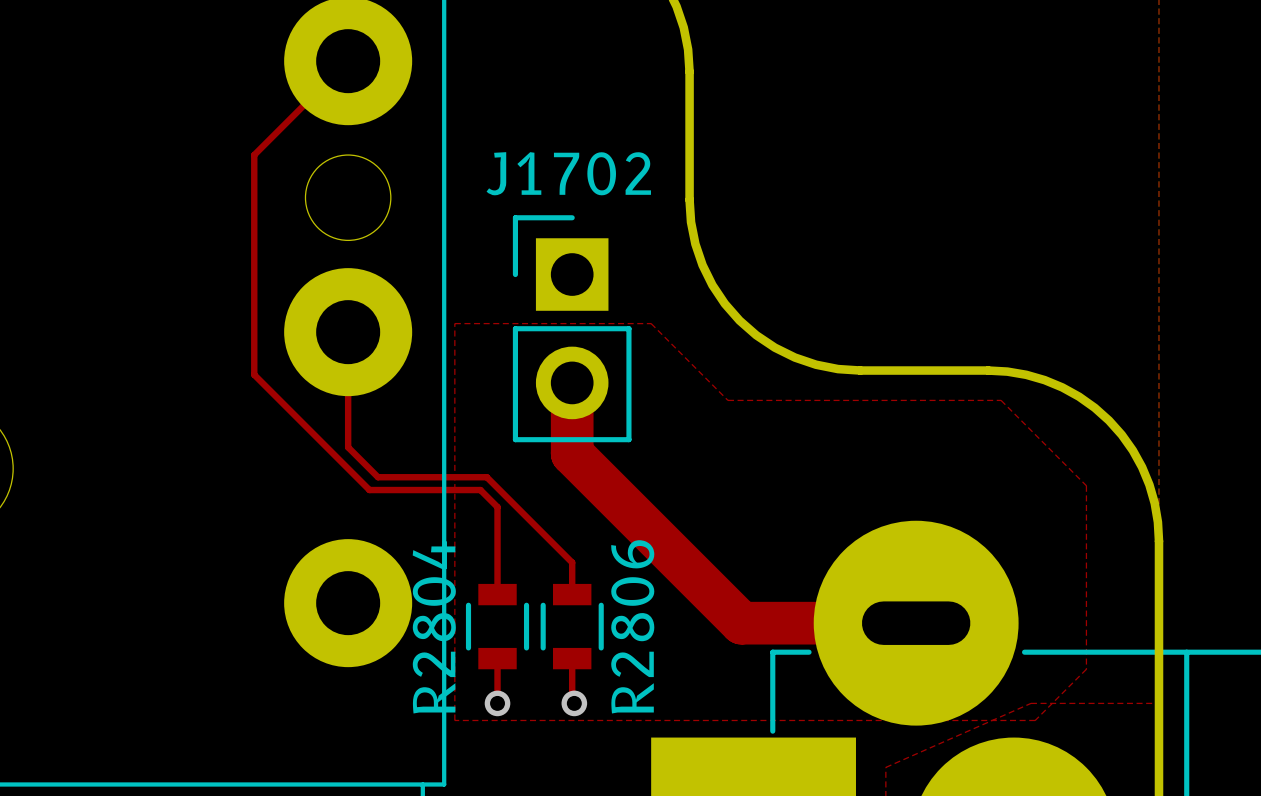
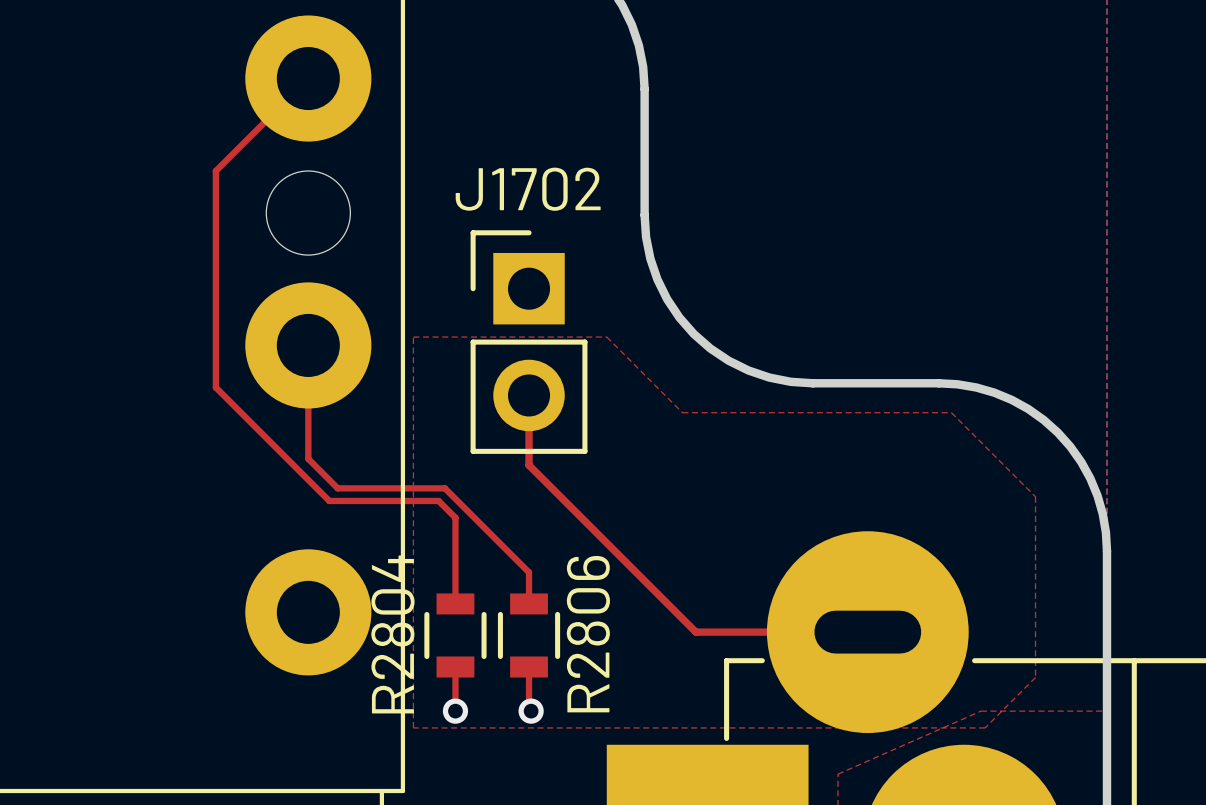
top track width: thick (572, 382) (572, 453) (741, 623) (916, 623) -> thin (529, 395) (529, 465) (695, 632) (867, 632)

